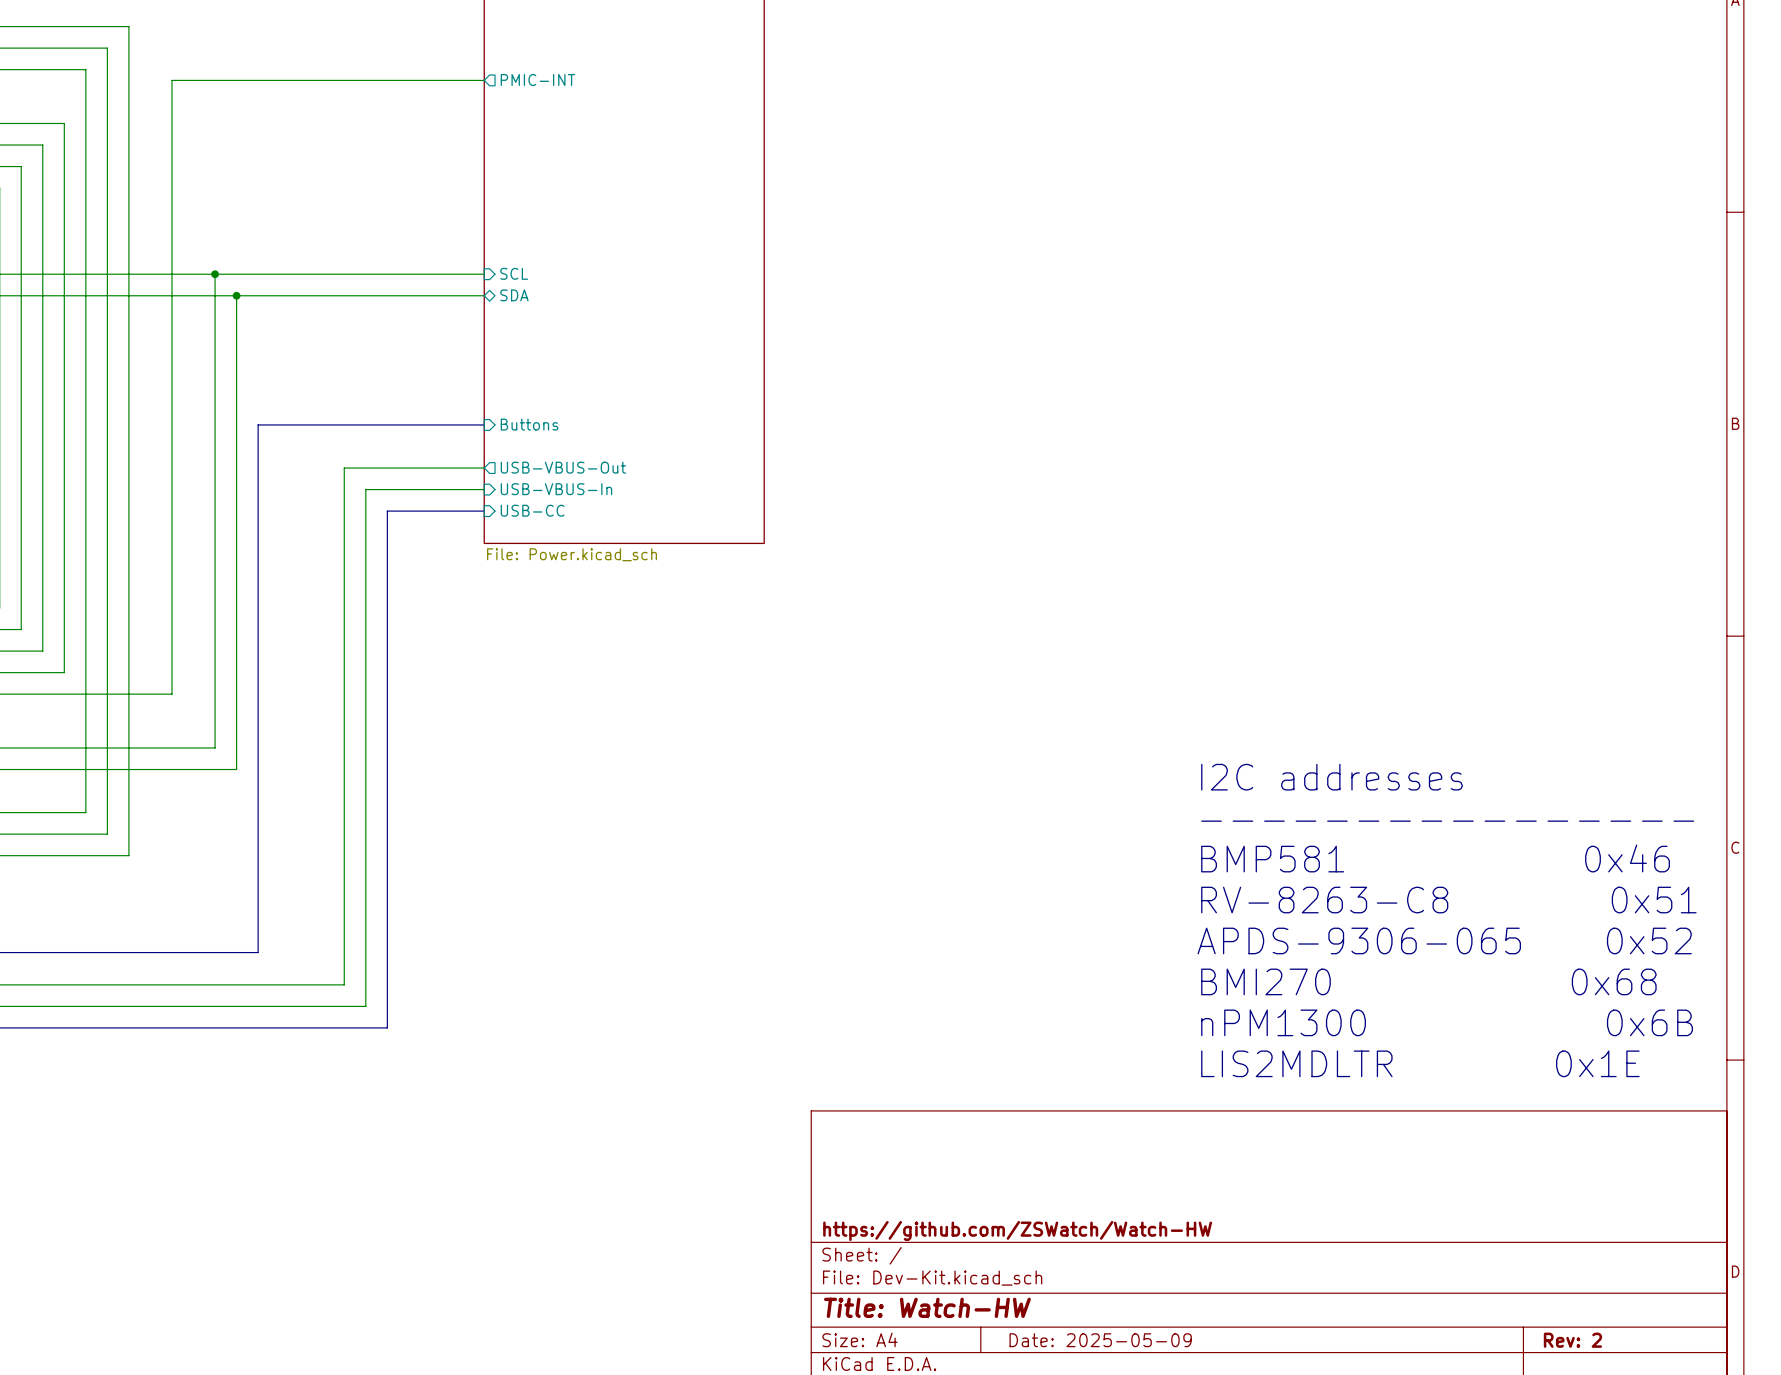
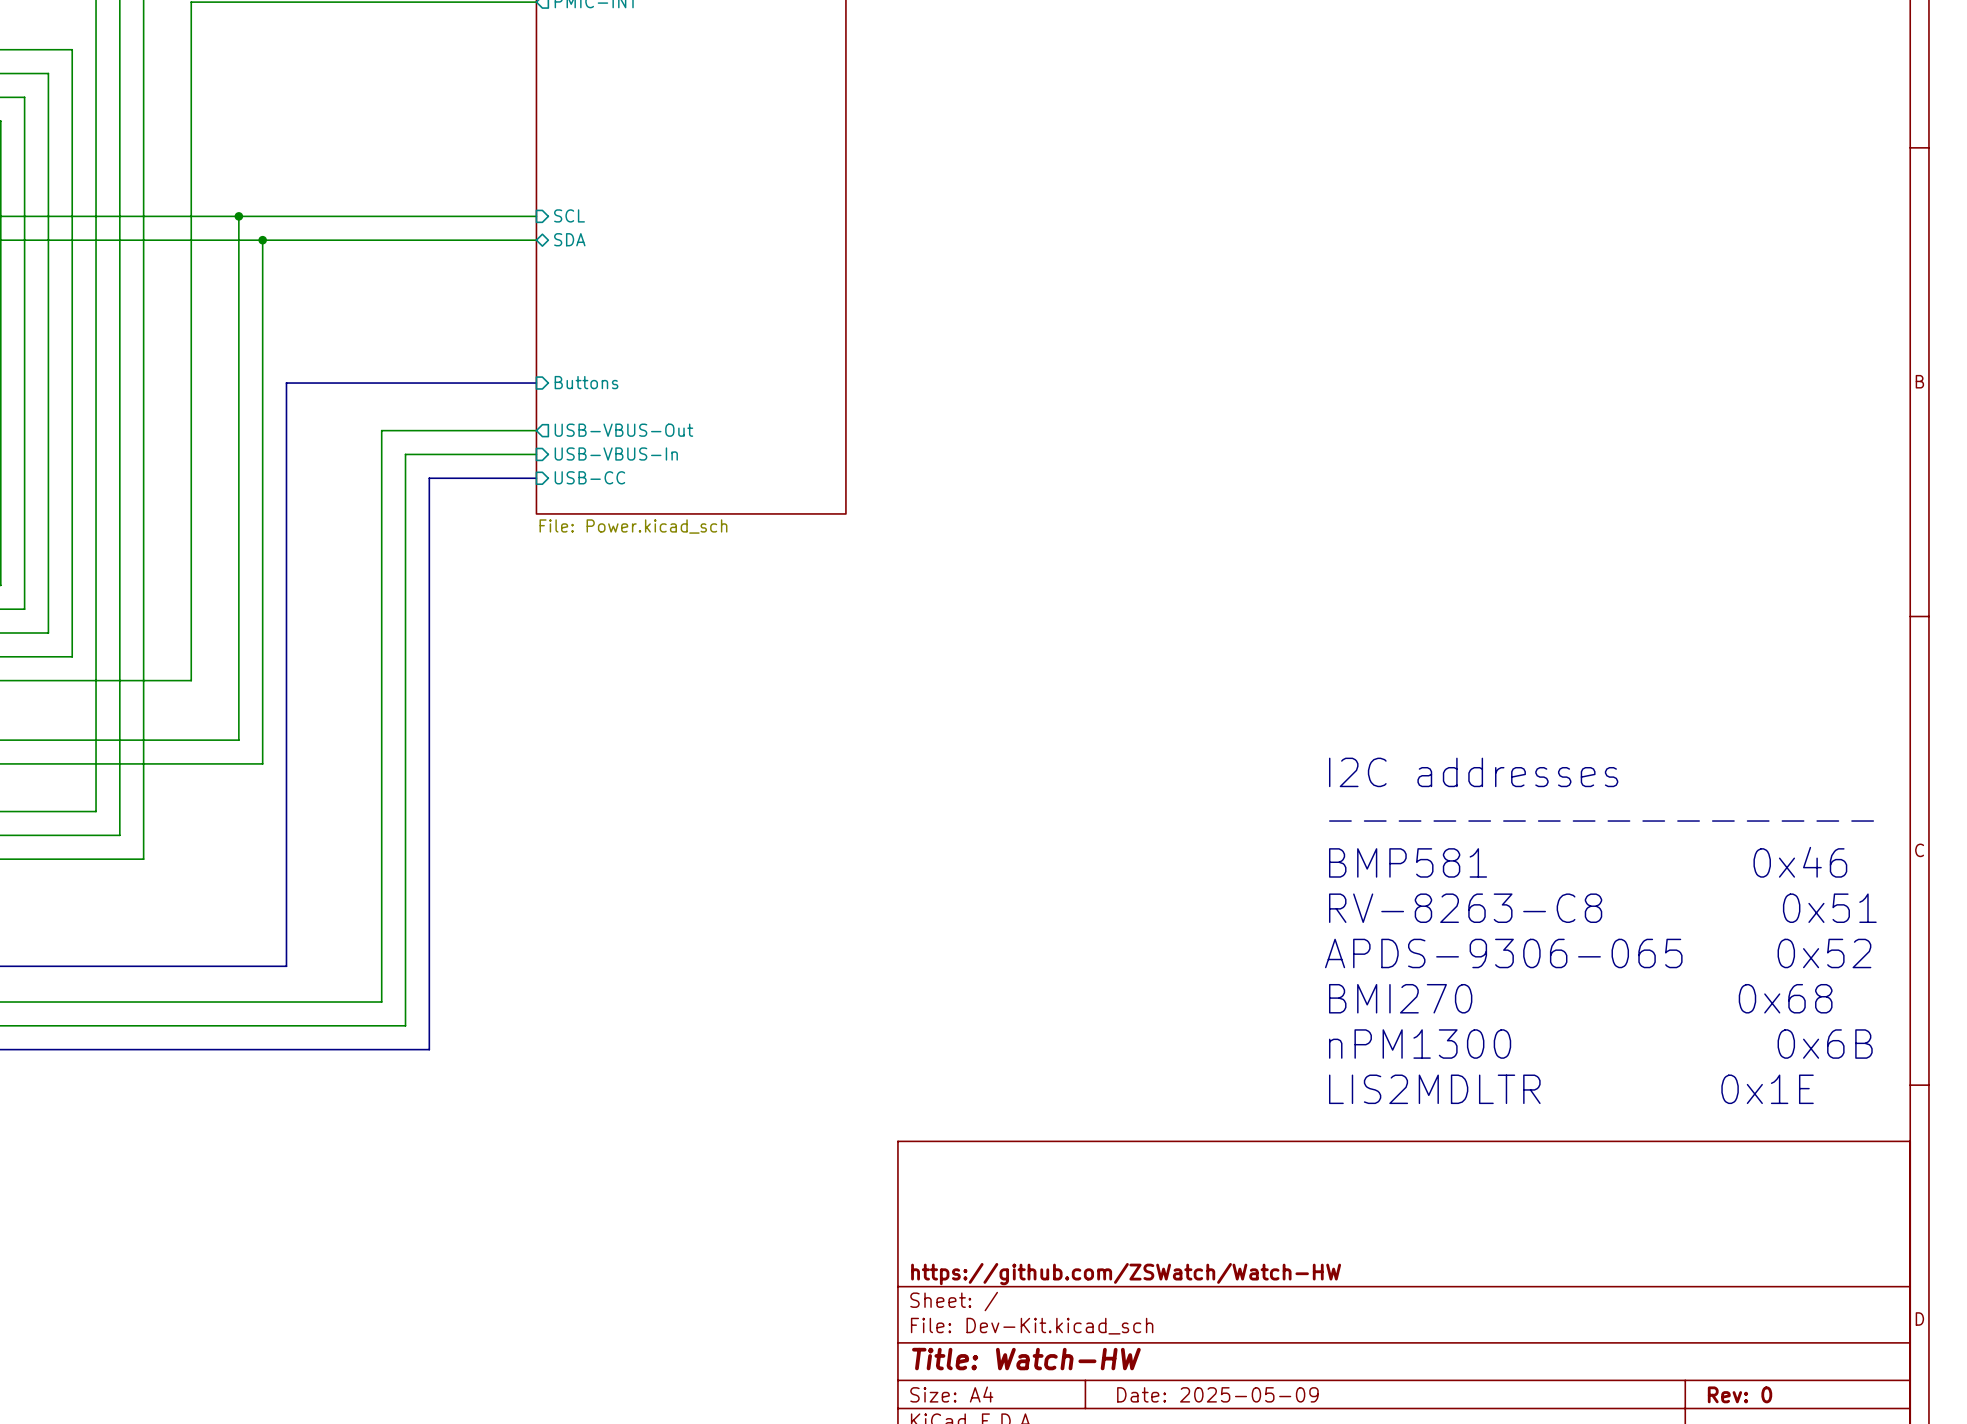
title block: Rev: 2 (1572, 1340) -> Rev: 0 (1740, 1394)

